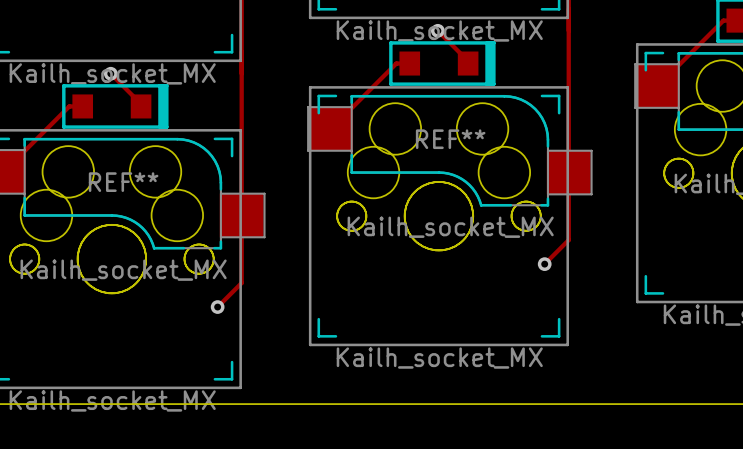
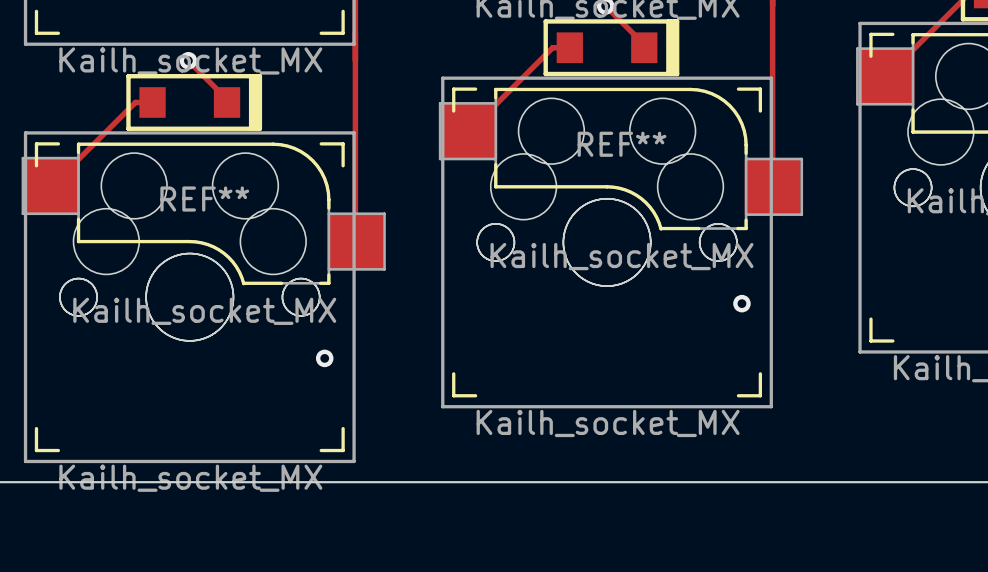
track: (568, 172) (568, 240) (544, 264) -> none
track: (241, 215) (241, 283) (217, 307) -> none

